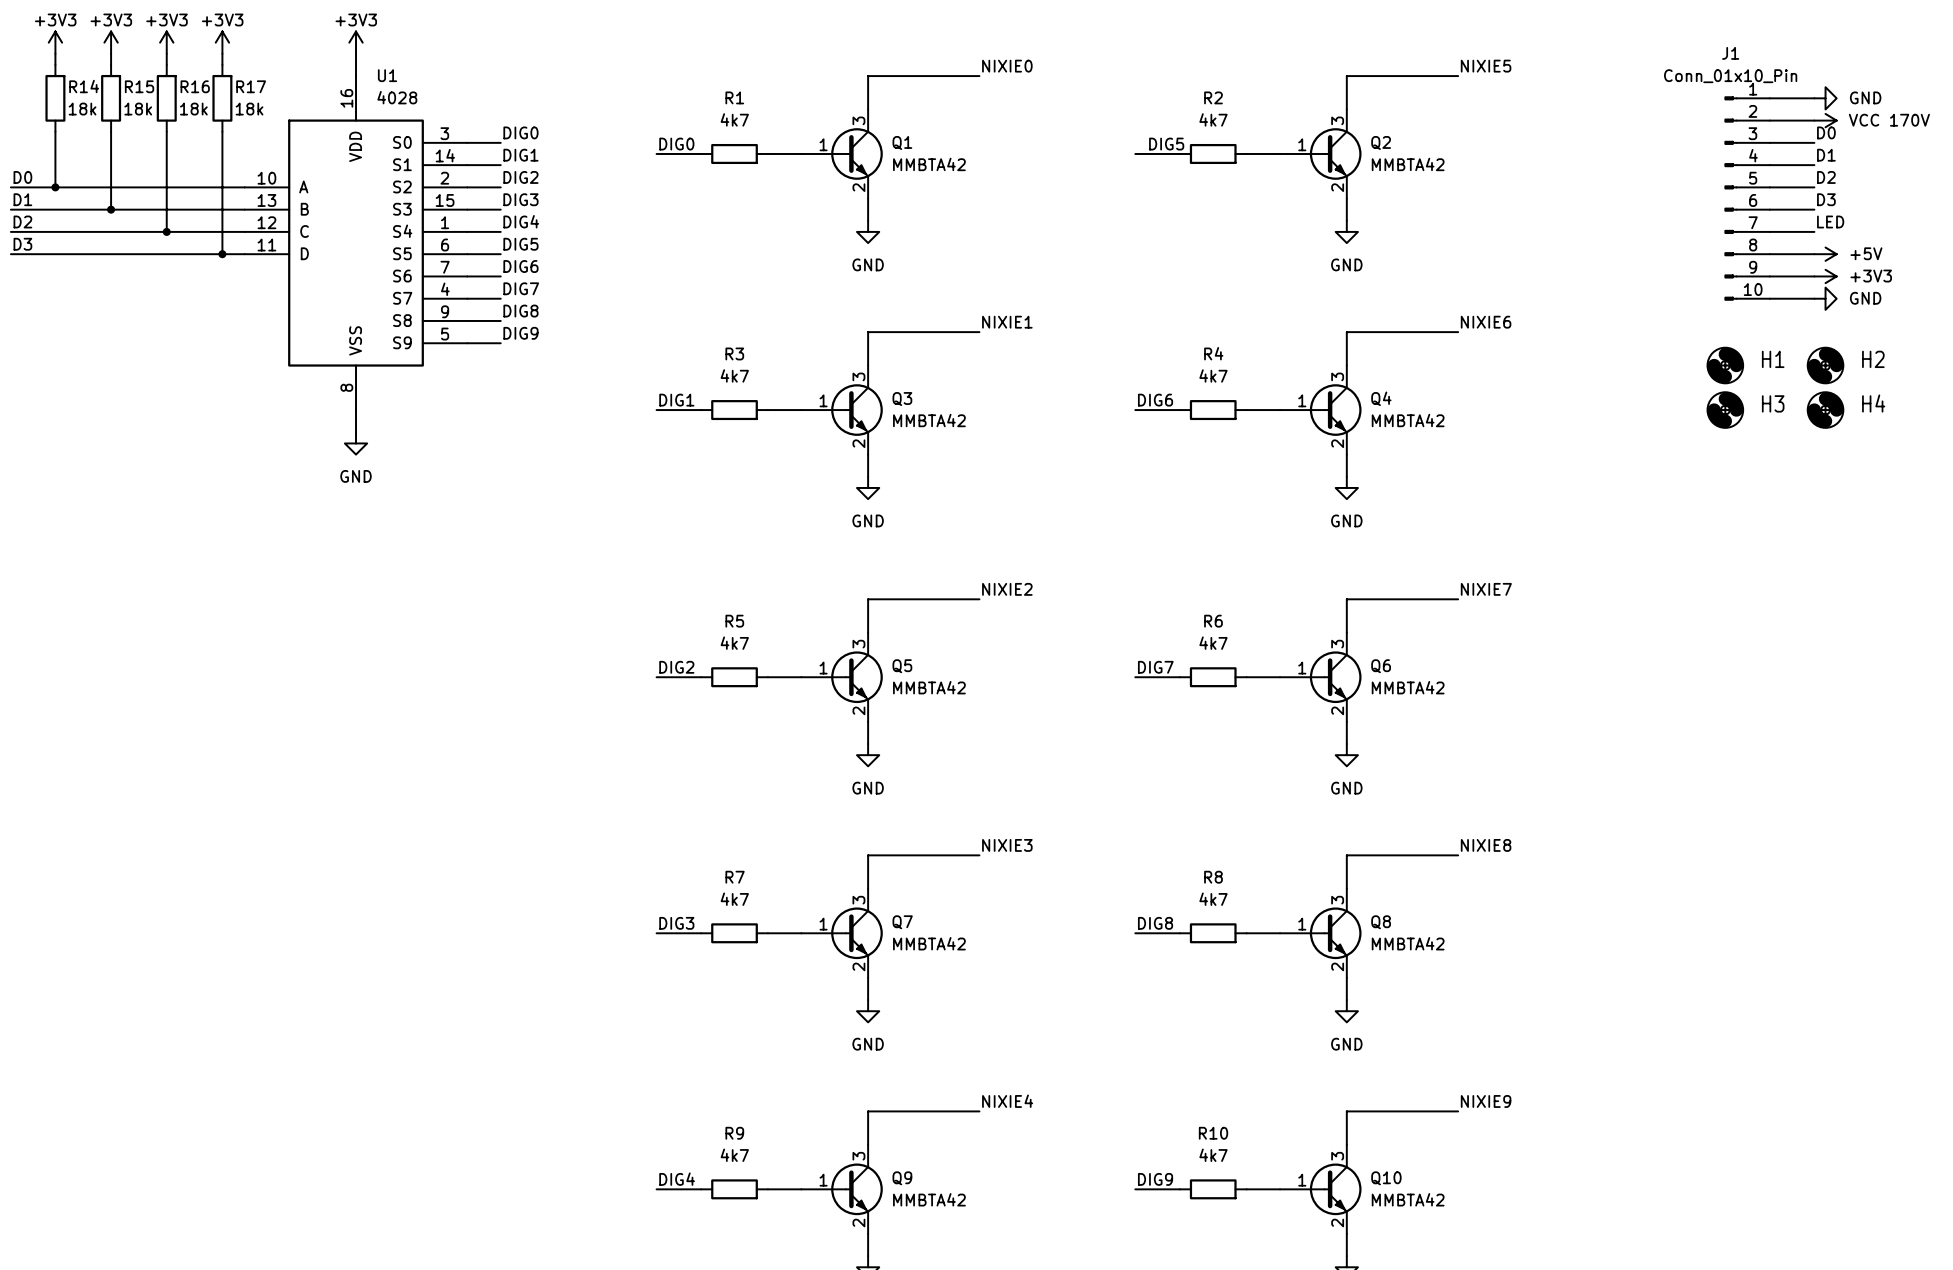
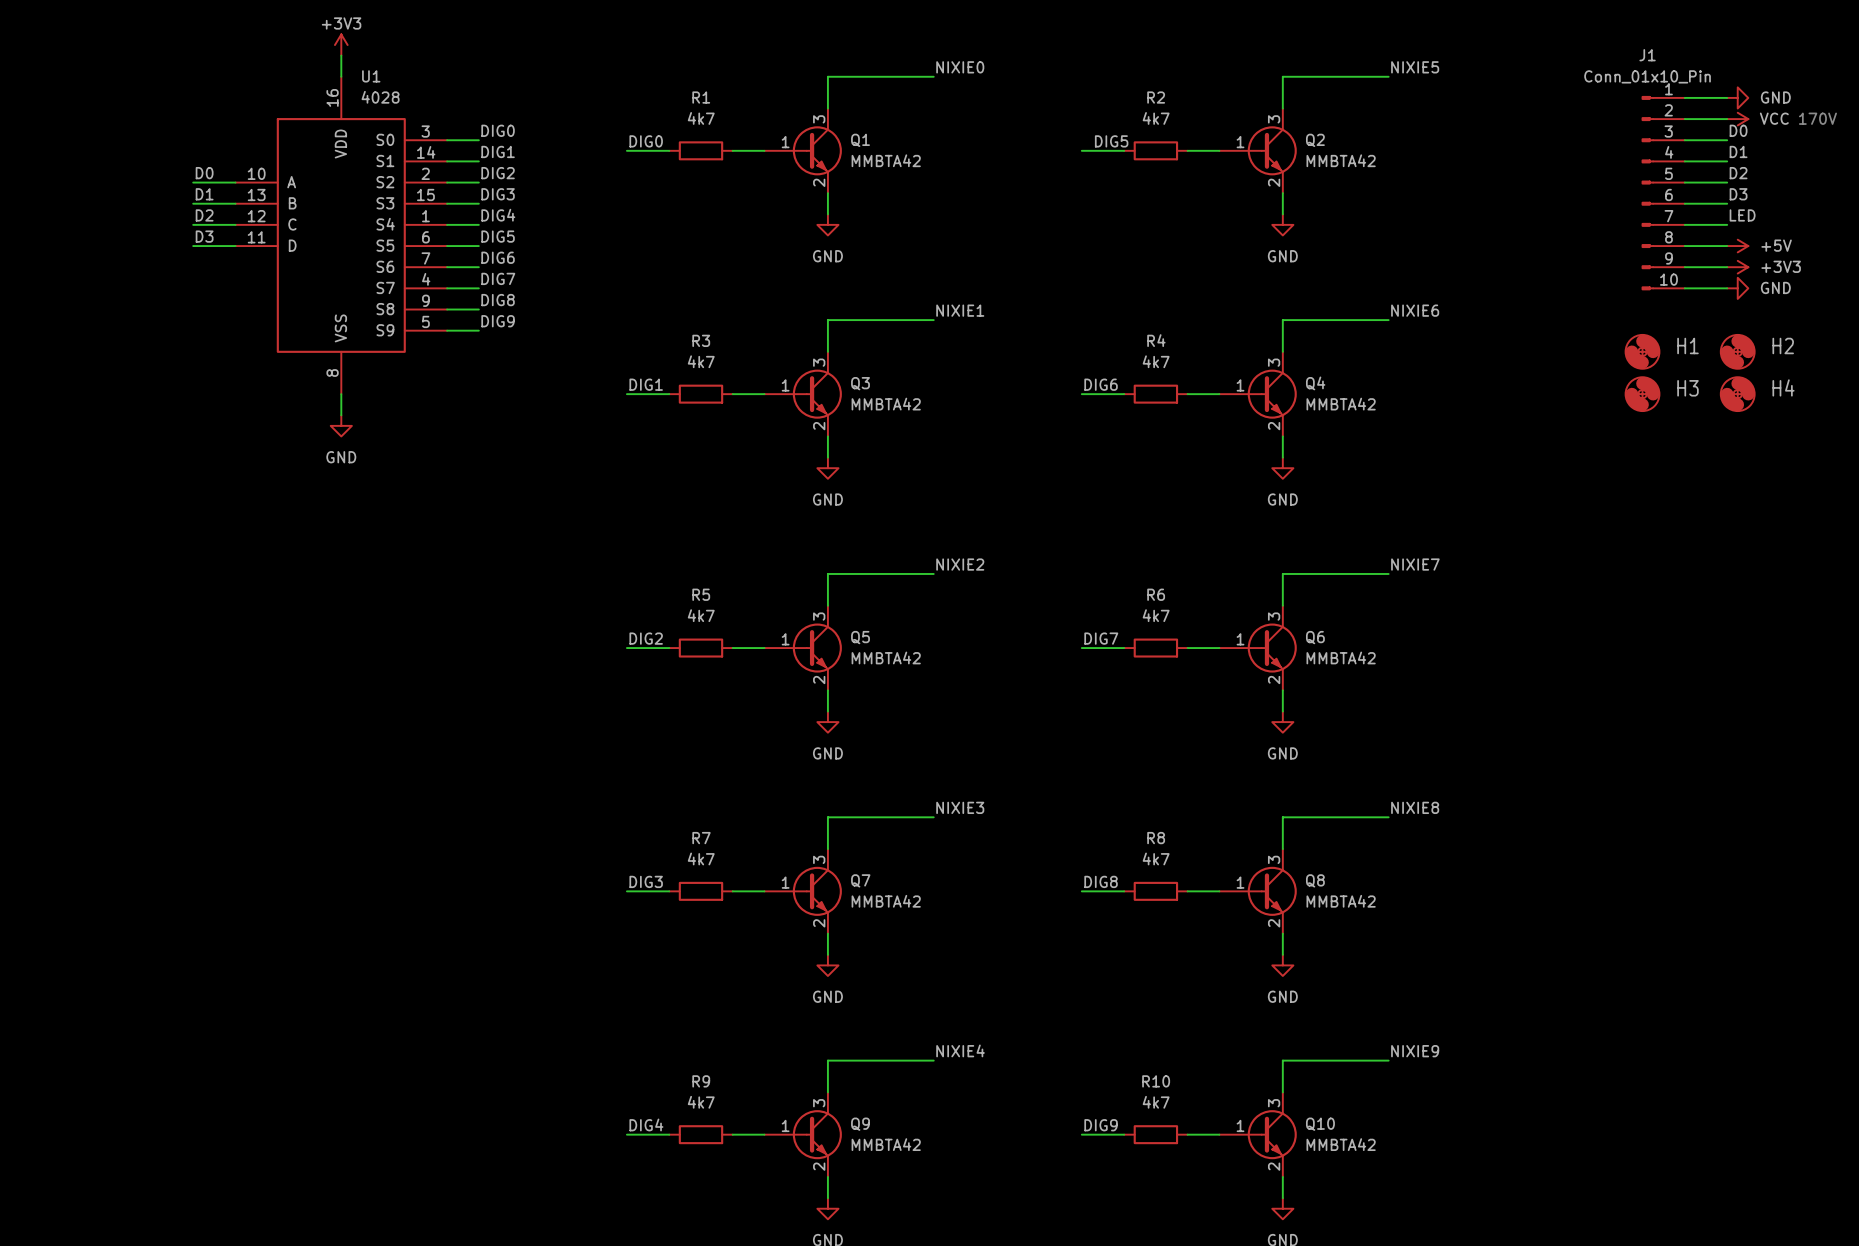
power symbol: +3V3 (55, 42) -> none
power symbol: +3V3 (111, 42) -> none
power symbol: +3V3 (166, 42) -> none
power symbol: +3V3 (222, 42) -> none
wire: (55, 53) (55, 64) -> none
wire: (111, 53) (111, 64) -> none
wire: (166, 53) (166, 64) -> none
wire: (222, 53) (222, 64) -> none
R14: 18k (55, 98) -> none
R15: 18k (111, 98) -> none
R16: 18k (166, 98) -> none
R17: 18k (222, 98) -> none
wire: (55, 131) (55, 187) -> none
wire: (111, 131) (111, 209) -> none
wire: (166, 131) (166, 231) -> none
wire: (222, 131) (222, 254) -> none
label position: D0 (22, 177) -> D0 (204, 173)
wire: (10, 187) (200, 187) -> none
junction: (55, 187) -> none
label position: D1 (22, 199) -> D1 (204, 194)
wire: (10, 209) (200, 209) -> none
junction: (111, 209) -> none
label position: D2 (22, 221) -> D2 (204, 215)
wire: (10, 231) (200, 231) -> none
junction: (166, 231) -> none
label position: D3 (22, 244) -> D3 (204, 236)
wire: (10, 254) (200, 254) -> none
junction: (222, 254) -> none

